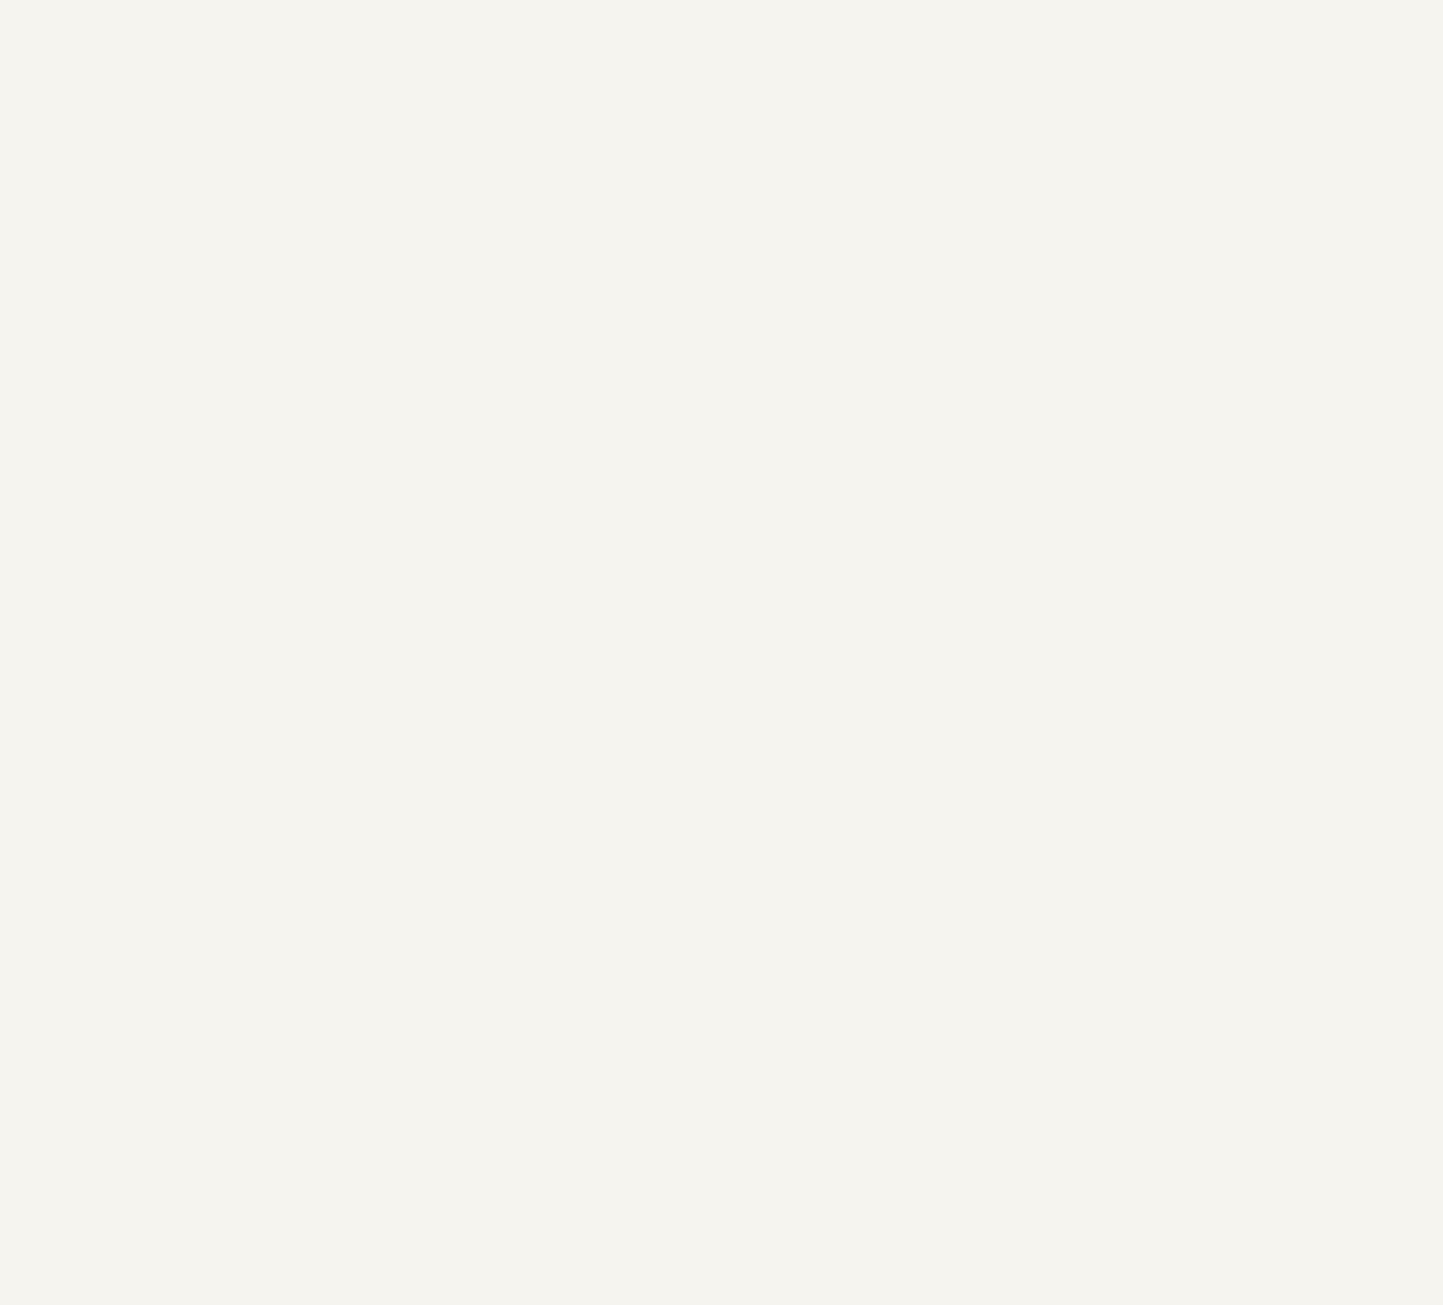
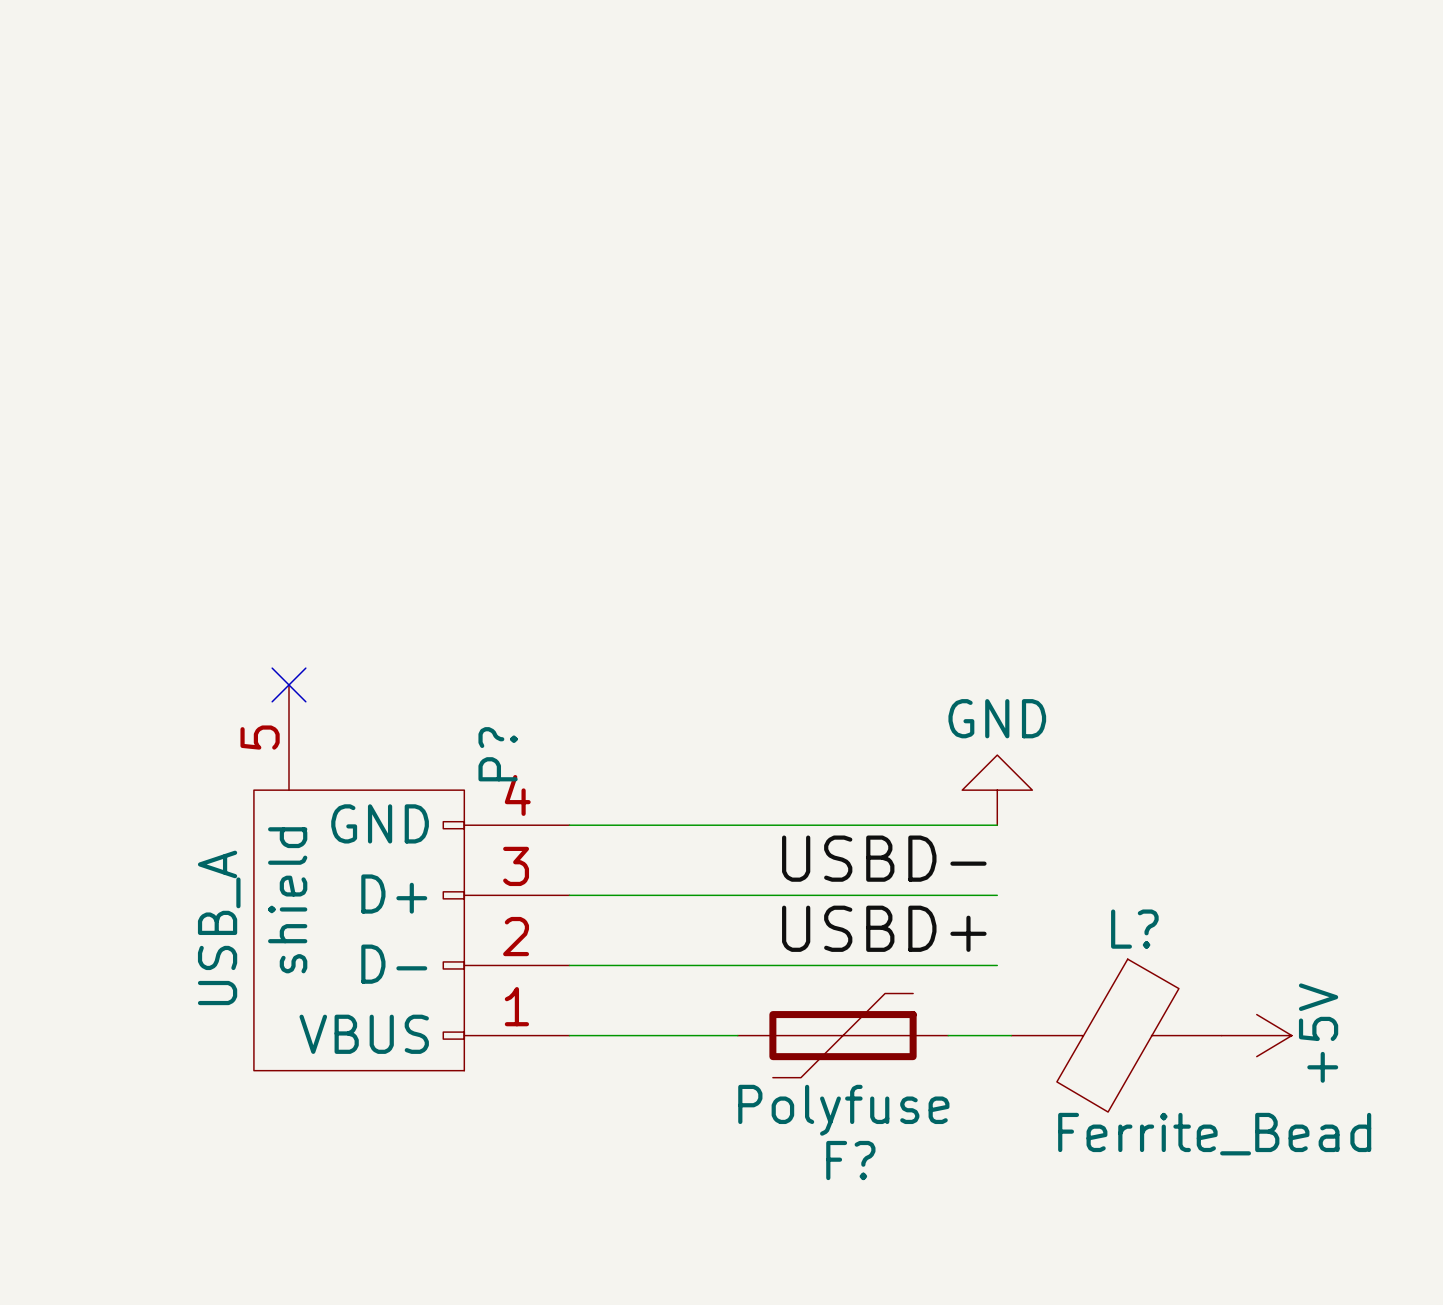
no-connect mark: none -> (288, 684)
power symbol: none -> GND (997, 790)
wire: none -> (569, 825) (997, 825)
label: none -> USBD- (884, 858)
P?: none -> USB_A (411, 877)
wire: none -> (569, 895) (997, 895)
label: none -> USBD+ (884, 928)
wire: none -> (569, 965) (997, 965)
wire: none -> (569, 1035) (737, 1035)
F?: none -> Polyfuse (843, 1035)
wire: none -> (948, 1035) (1011, 1035)
L?: none -> Ferrite_Bead (1116, 1035)
power symbol: none -> +5V (1256, 1035)

